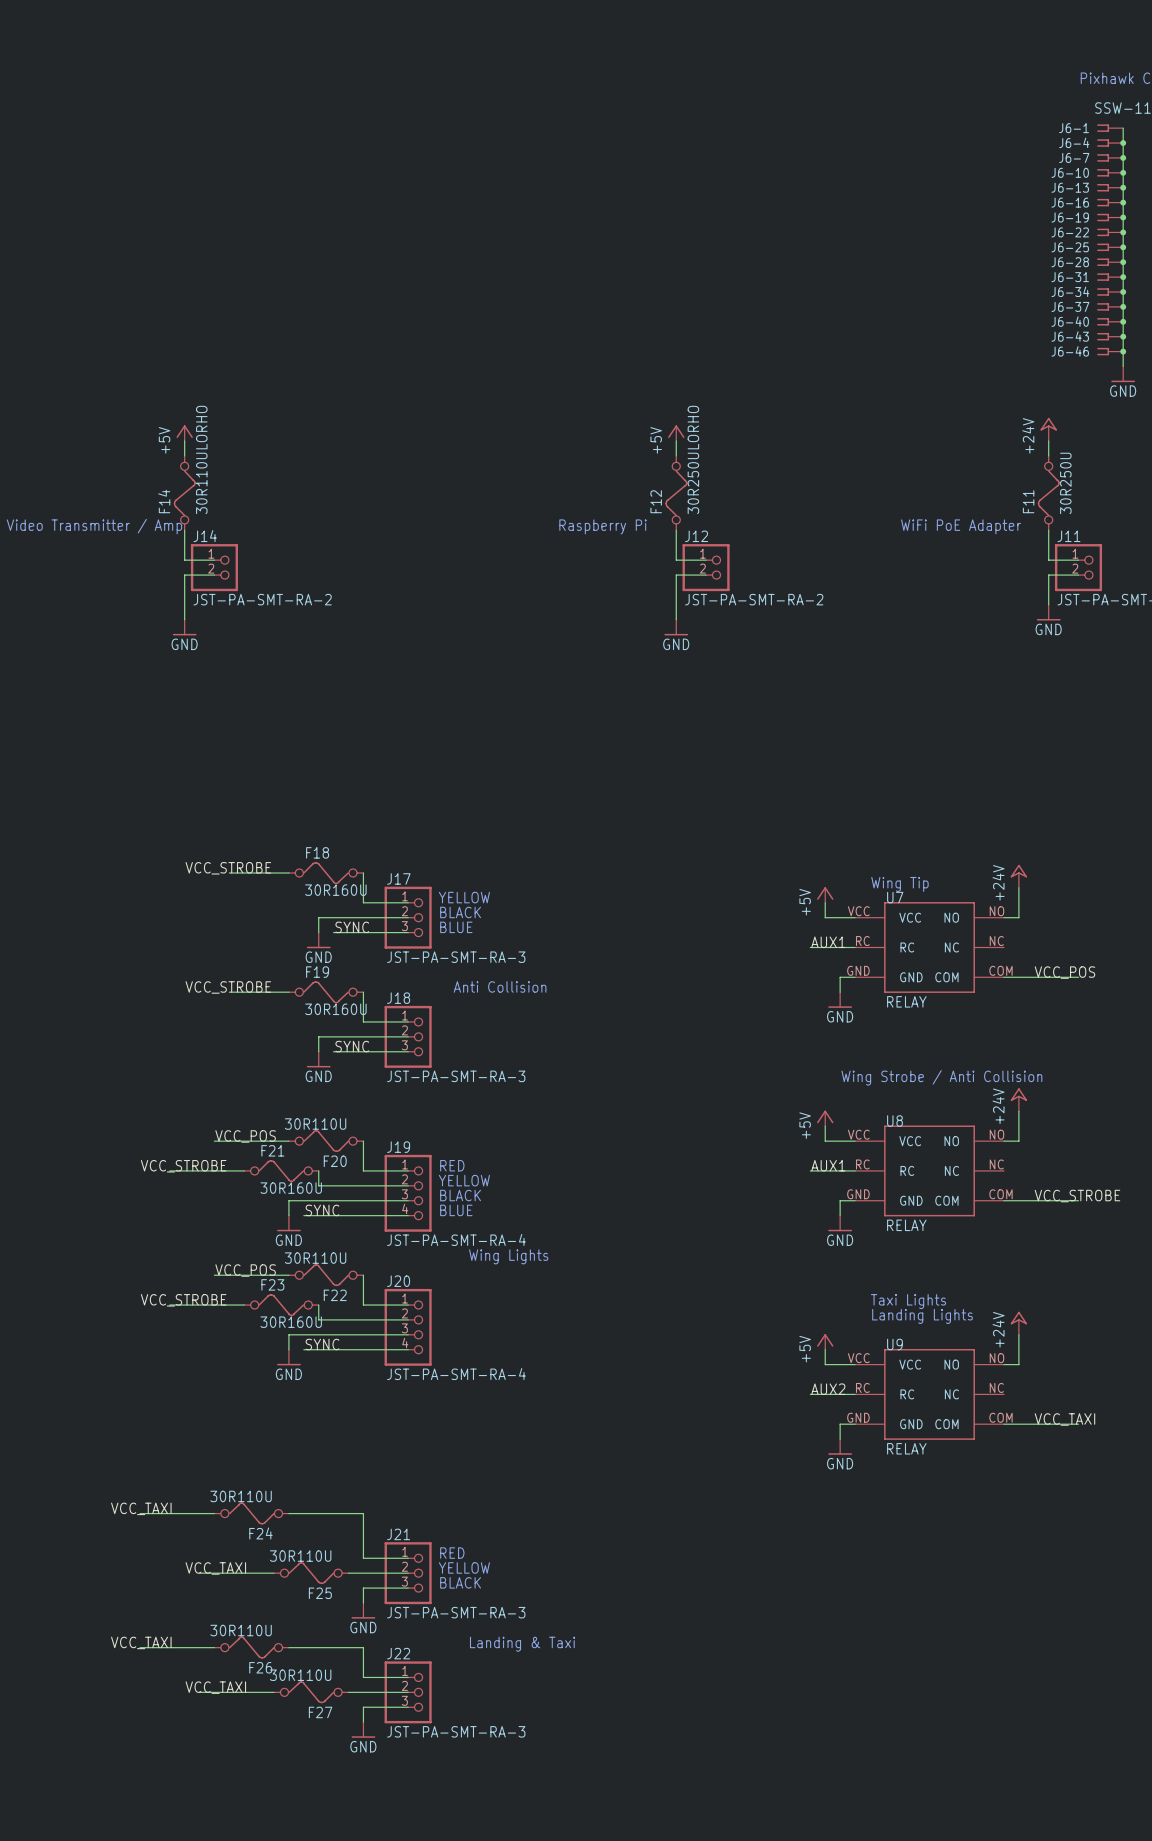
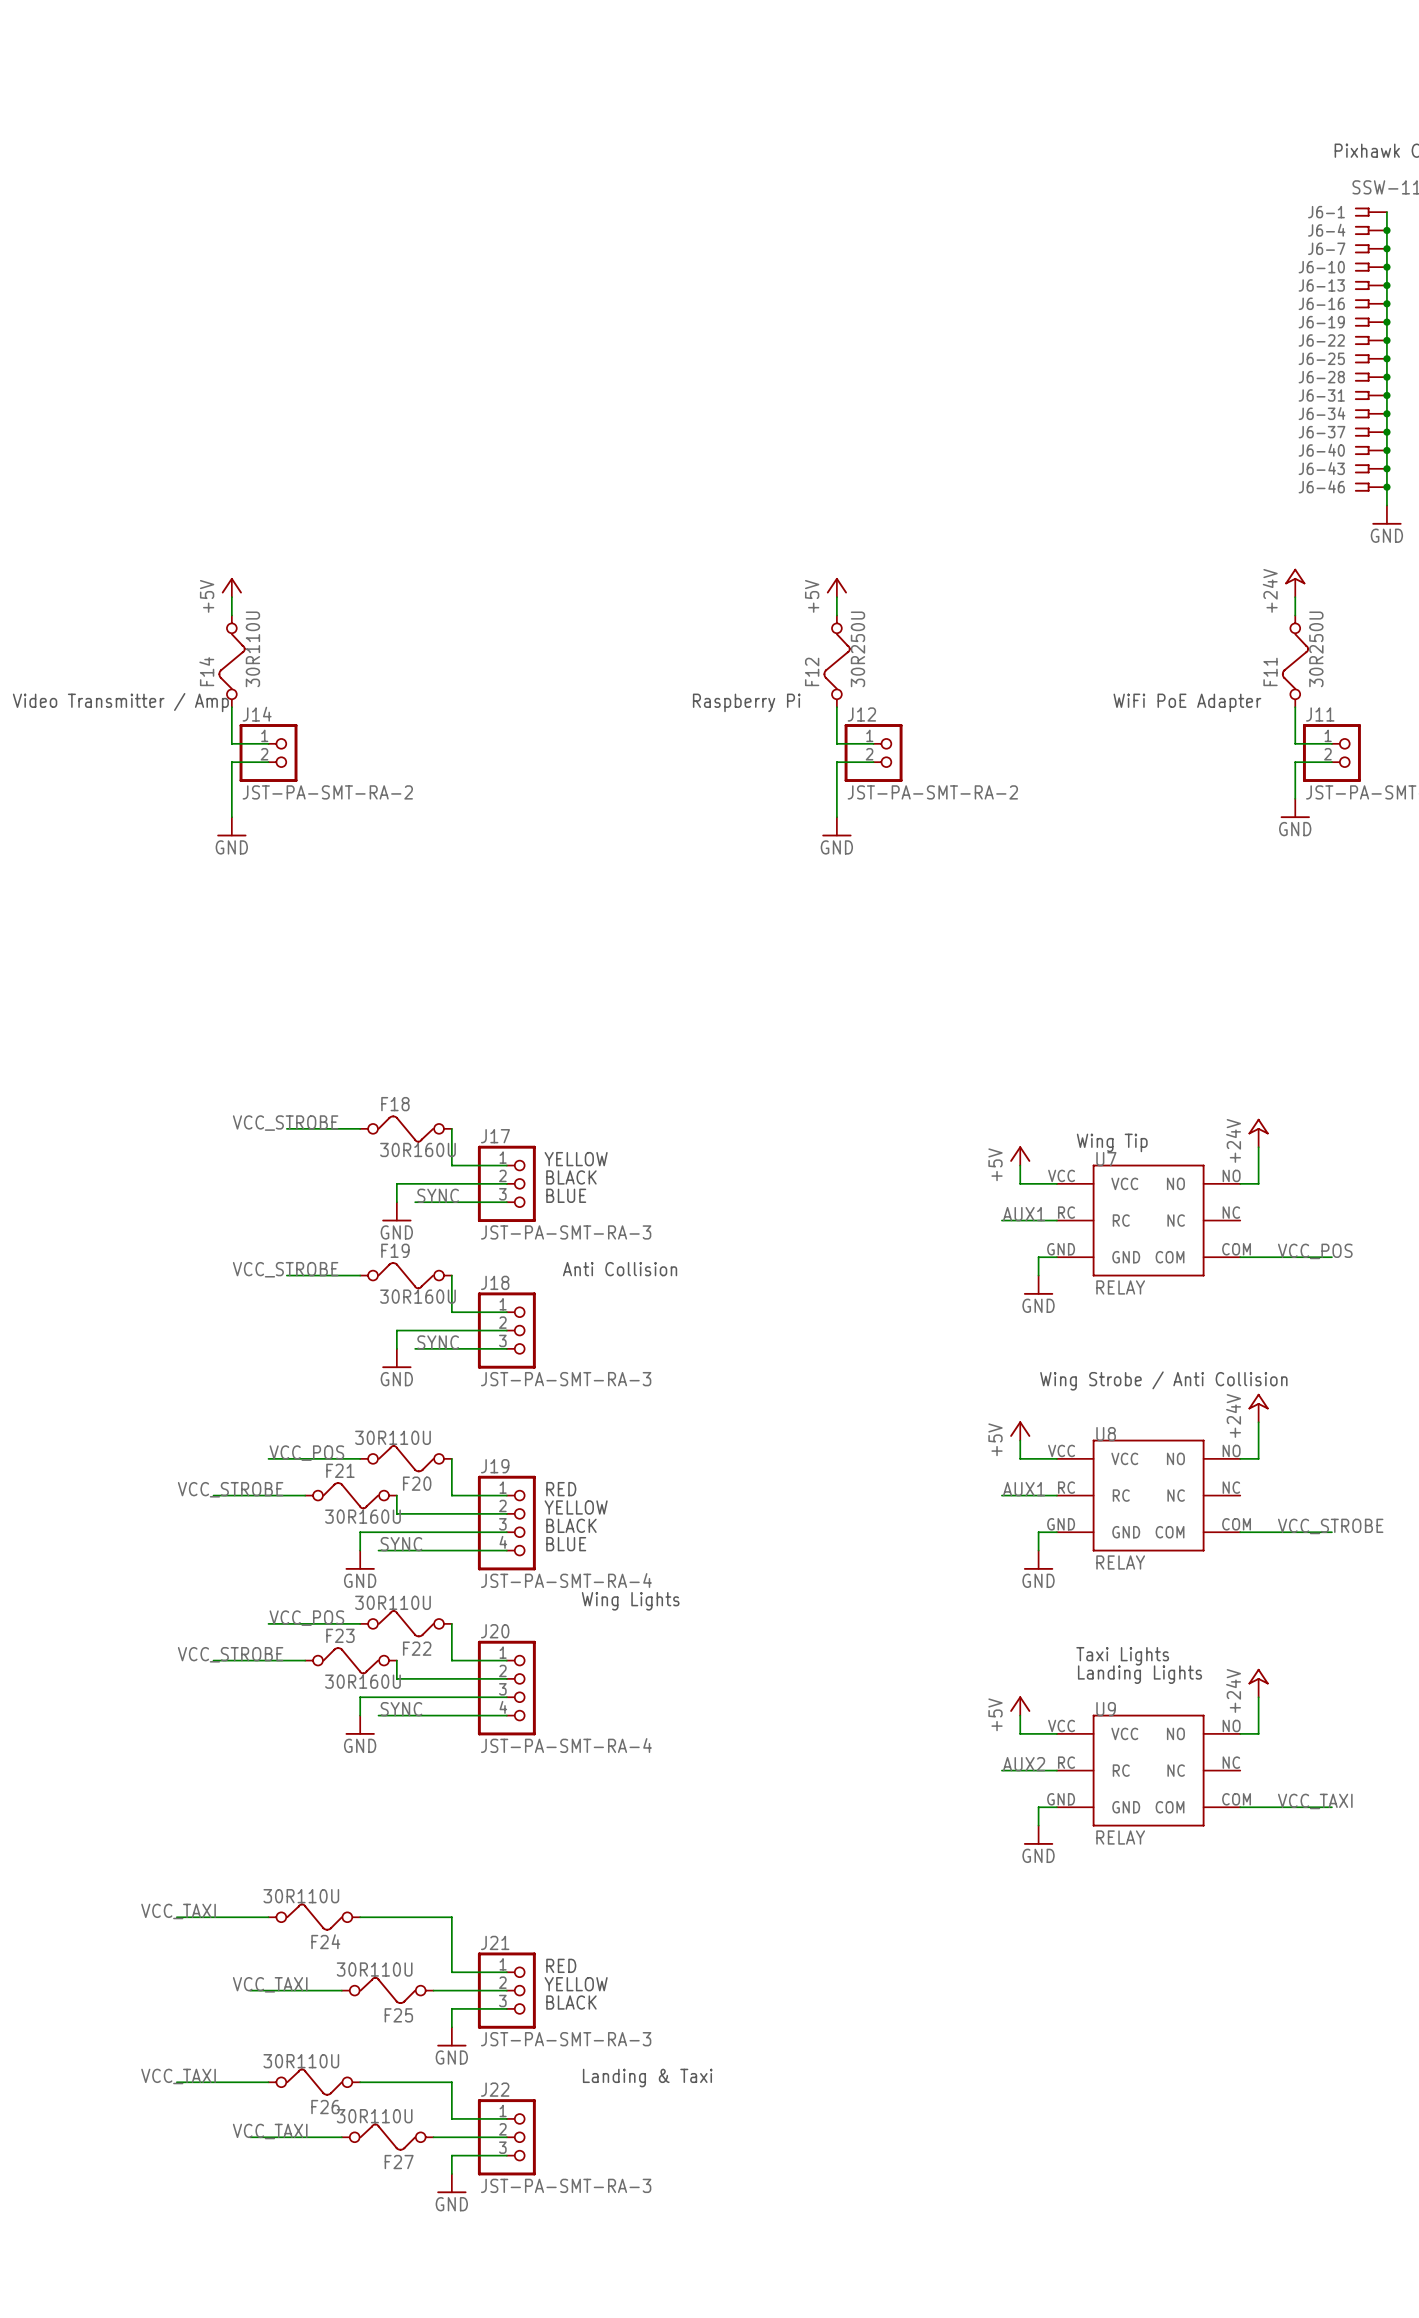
F14 value: 30R110ULORHO (201, 459) -> 30R110U (252, 649)
F12 value: 30R250ULORHO (693, 459) -> 30R250U (857, 649)

